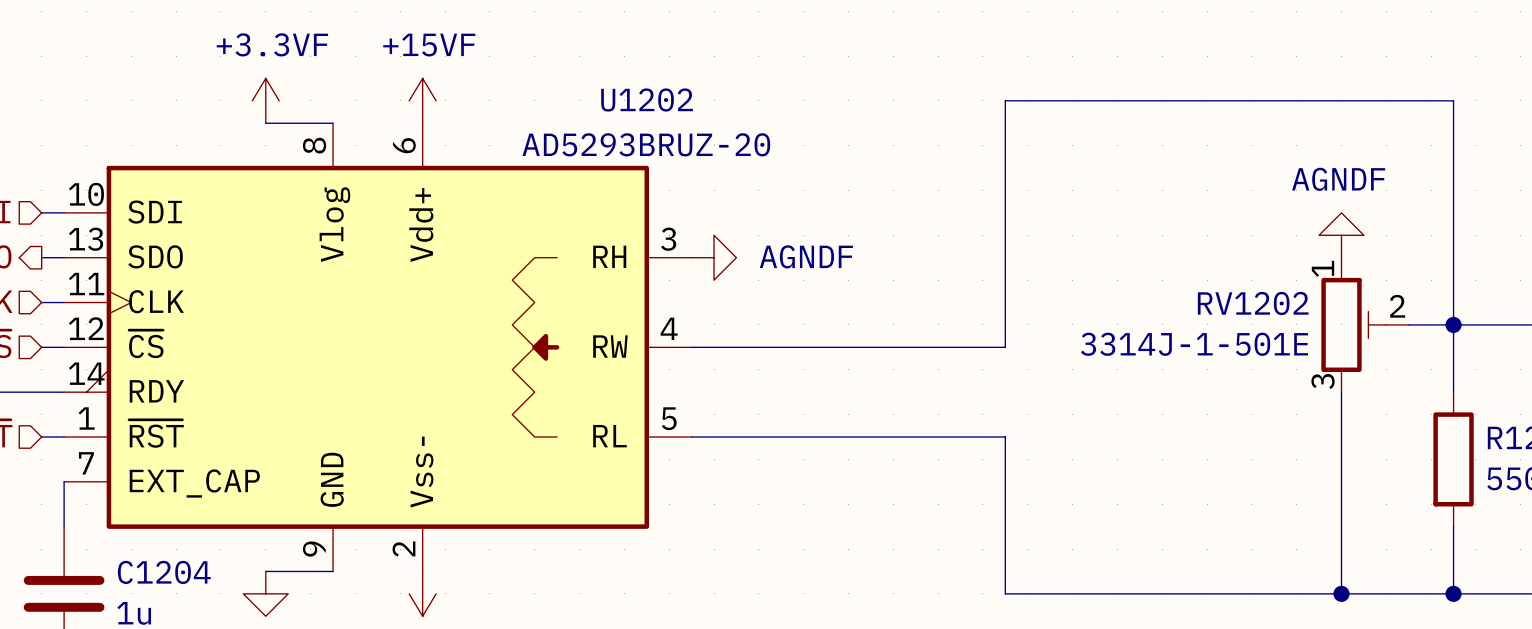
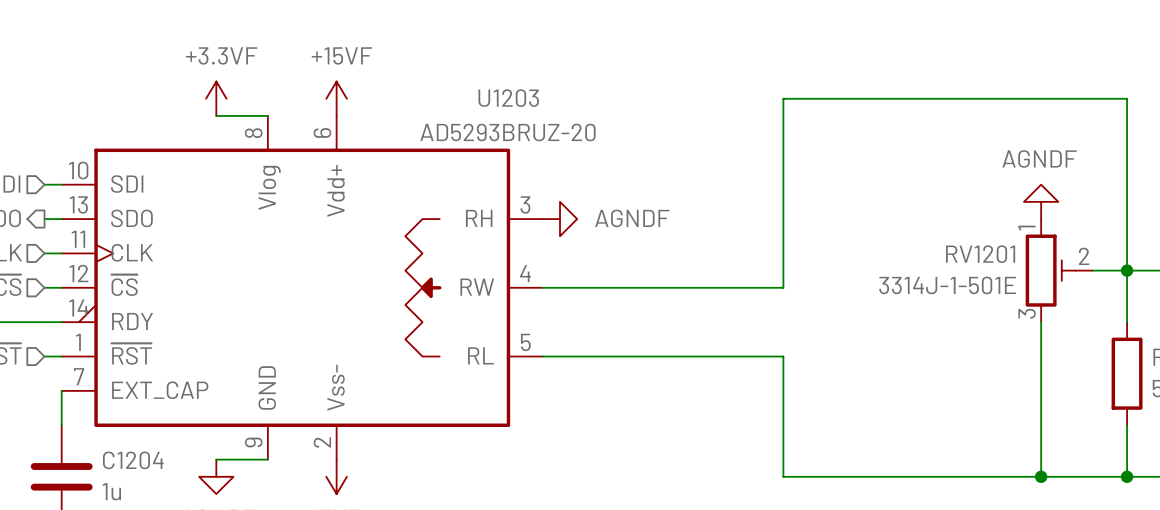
U1202 name: U1202 (647, 100) -> U1203 (508, 98)
RV1202 name: RV1202 (1253, 303) -> RV1201 (980, 254)

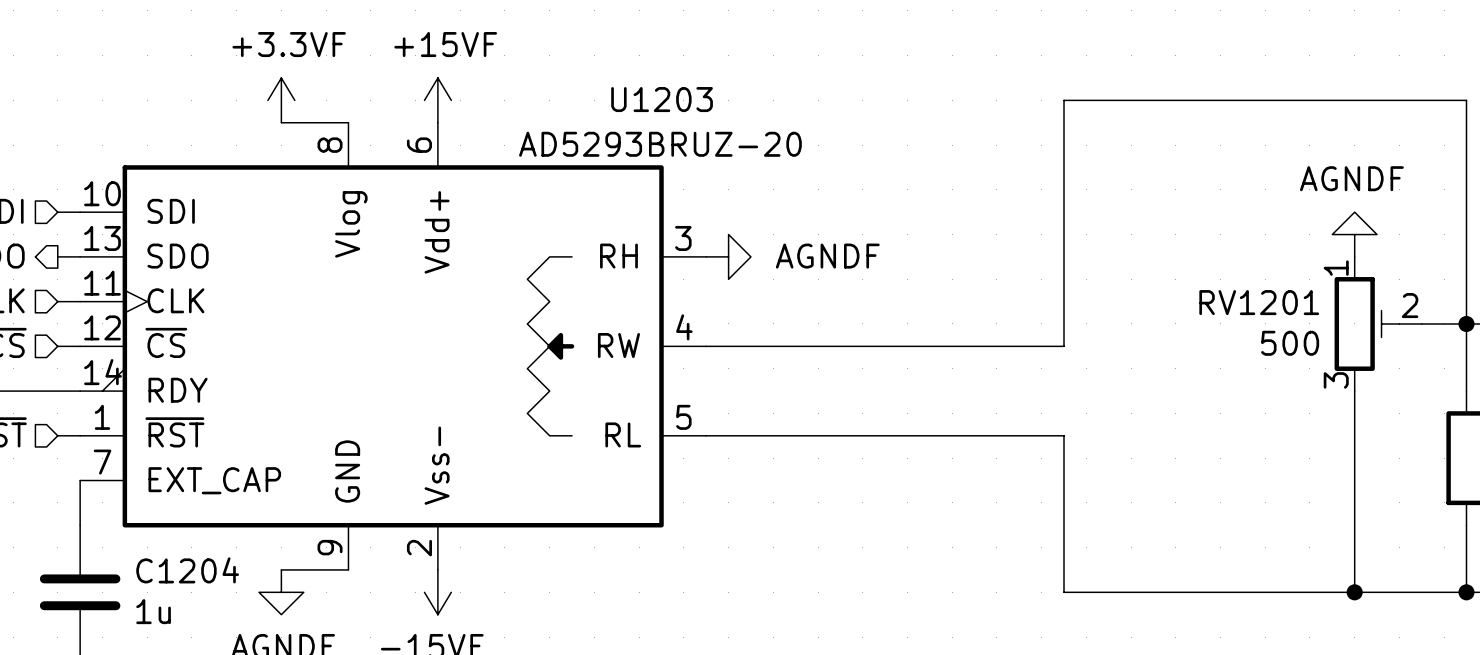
wire: (817, 98) (783, 98) (783, 287) -> (1064, 100) (1064, 346) (1019, 346)
RV1201 value: 3314J-1-501E (947, 285) -> 500 (1290, 343)
wire: (783, 356) (783, 476) (817, 476) -> (1019, 435) (1064, 435) (1064, 592)

